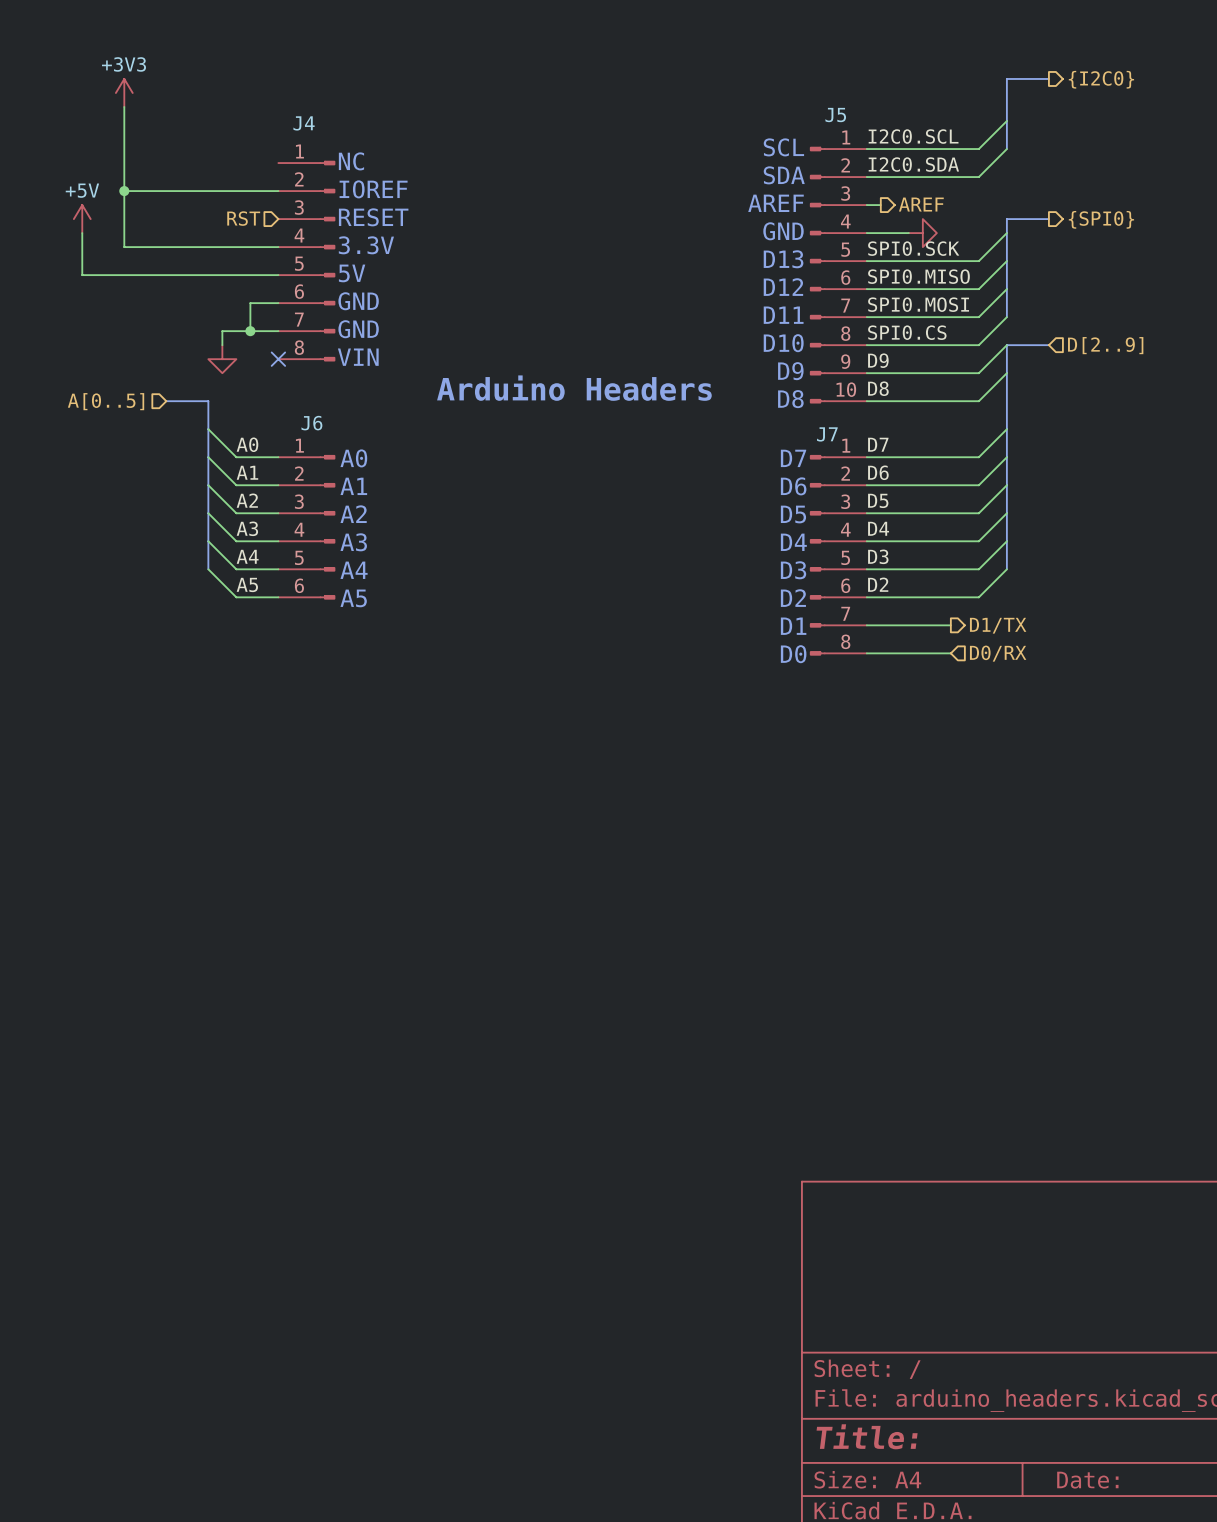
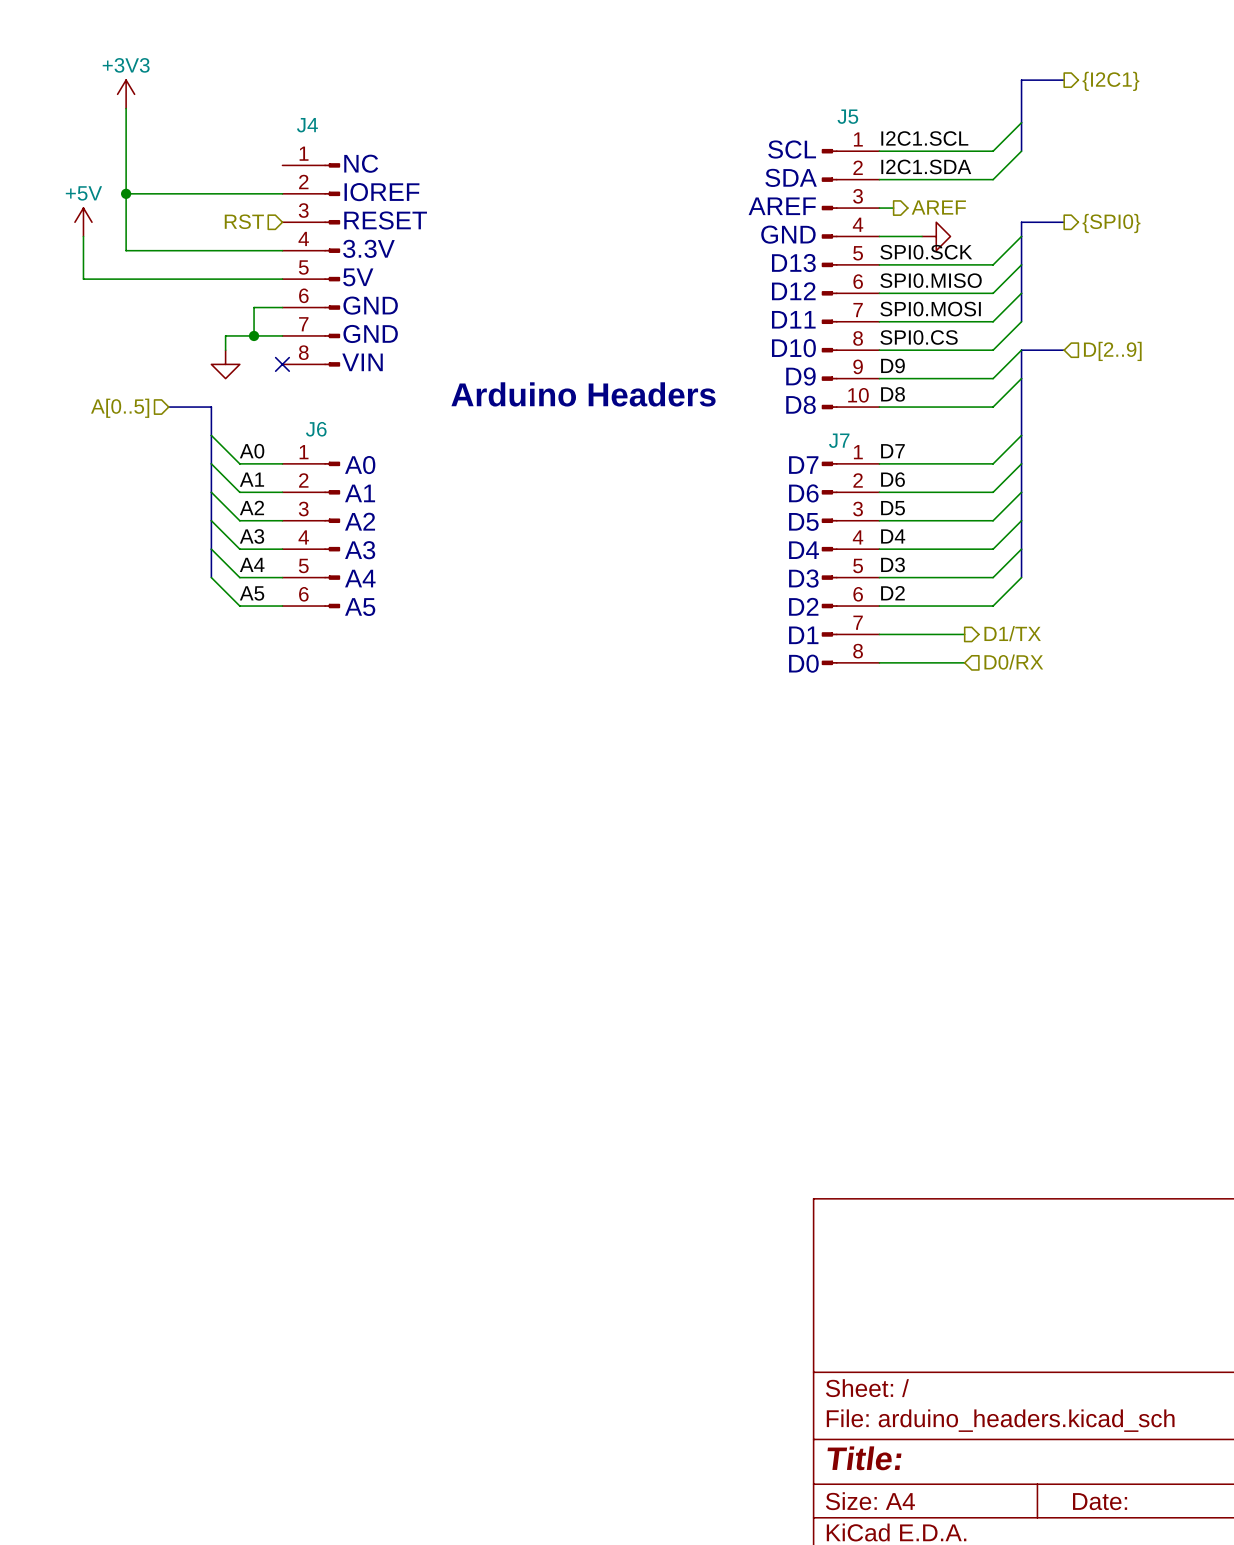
hierarchical label: {I2C0} (1101, 79) -> {I2C1} (1110, 81)
label: I2C0.SCL (913, 136) -> I2C1.SCL (924, 138)
label: I2C0.SDA (913, 164) -> I2C1.SDA (926, 166)

